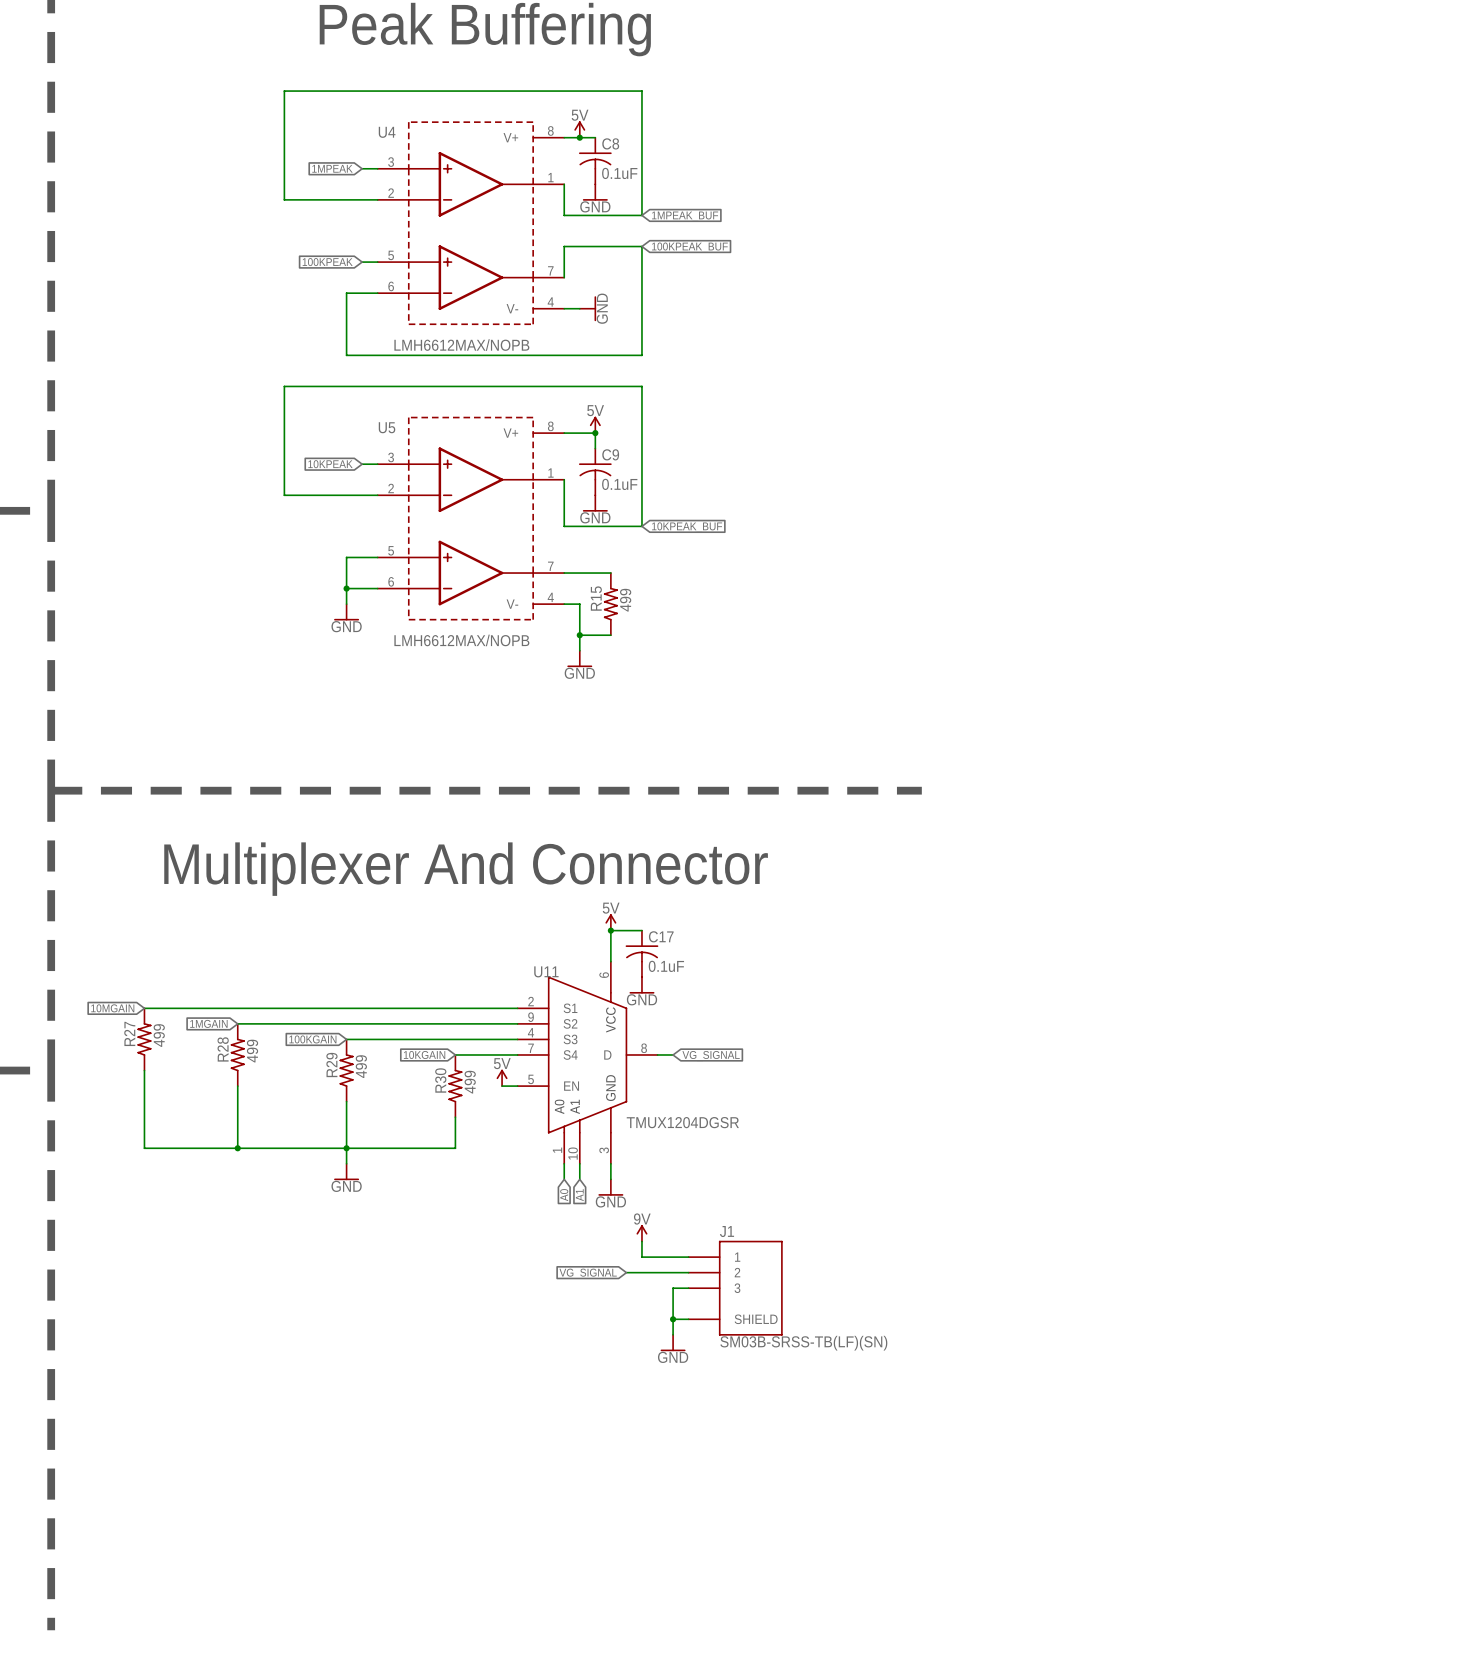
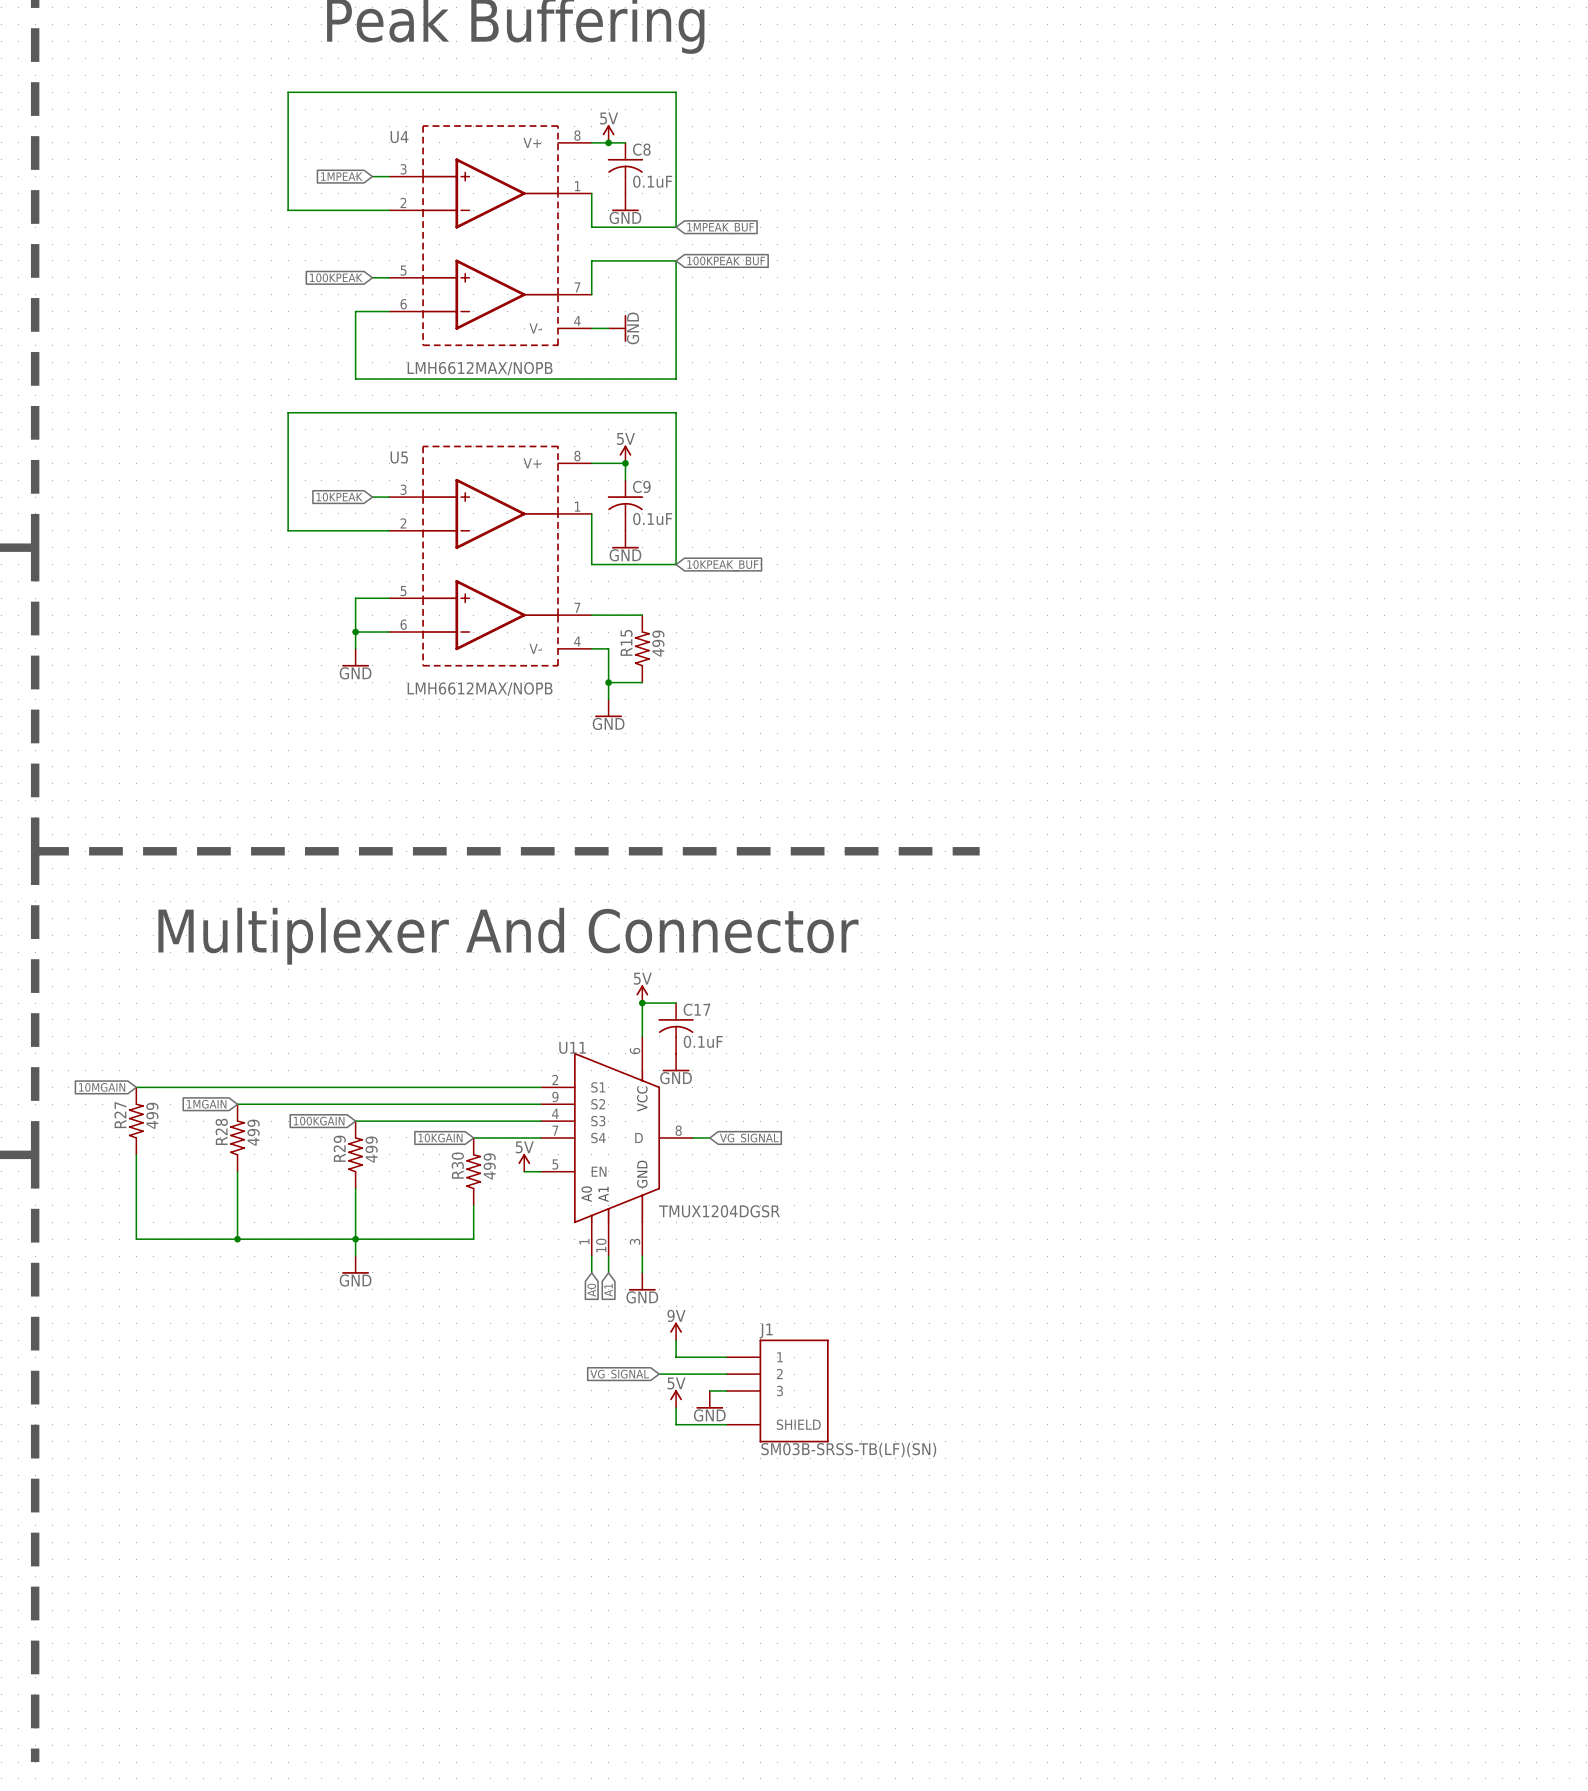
wire: (673, 1288) (673, 1334) -> none
power symbol: none -> 5V (676, 1398)
wire: none -> (676, 1407) (676, 1424) (709, 1424)
junction: (673, 1319) -> none
power symbol position: GND (673, 1343) -> GND (709, 1399)

